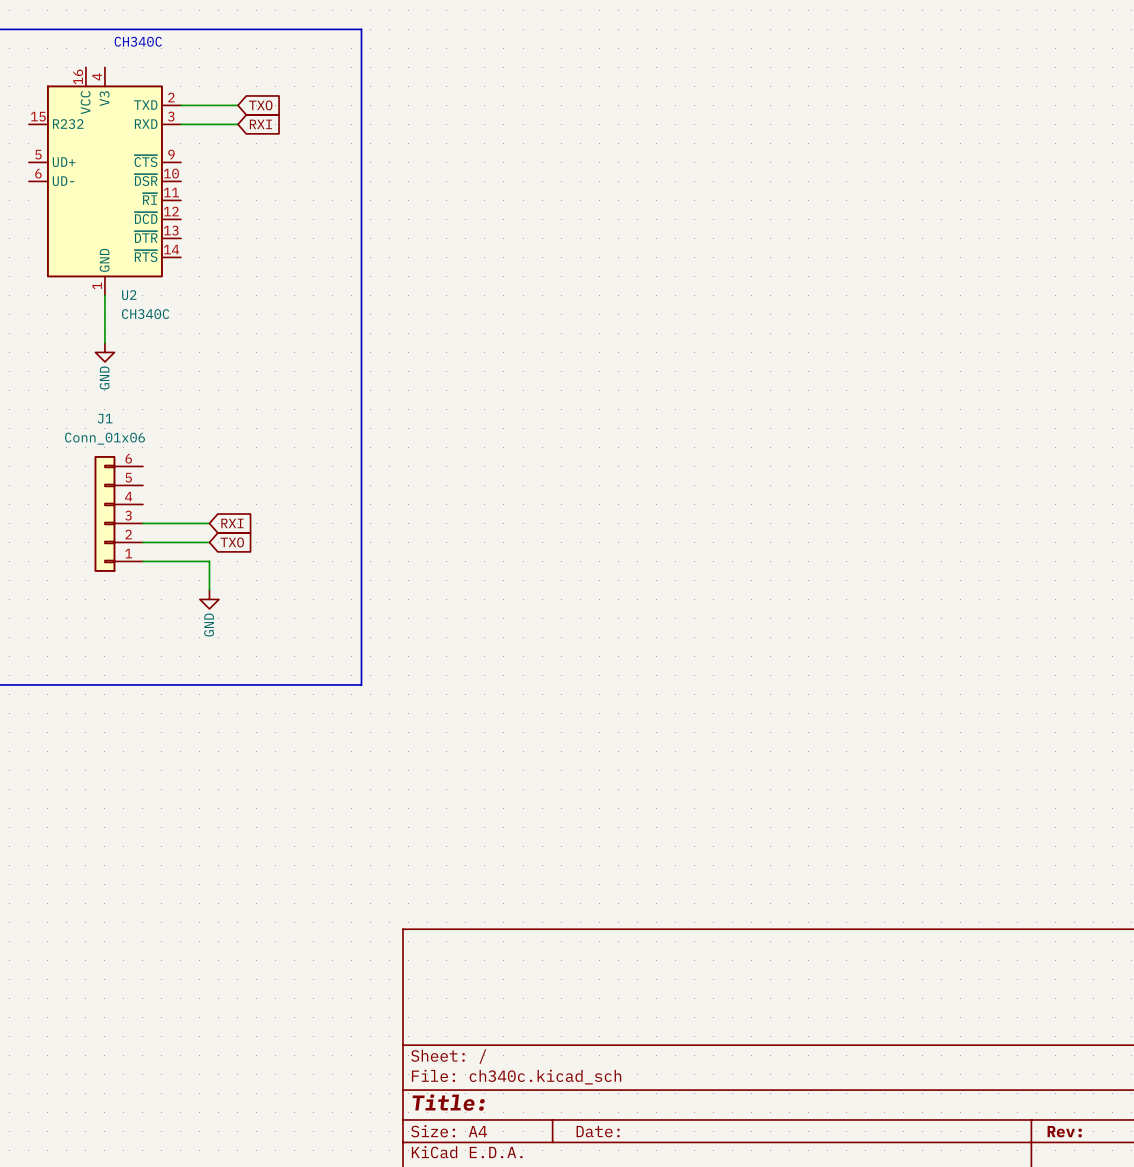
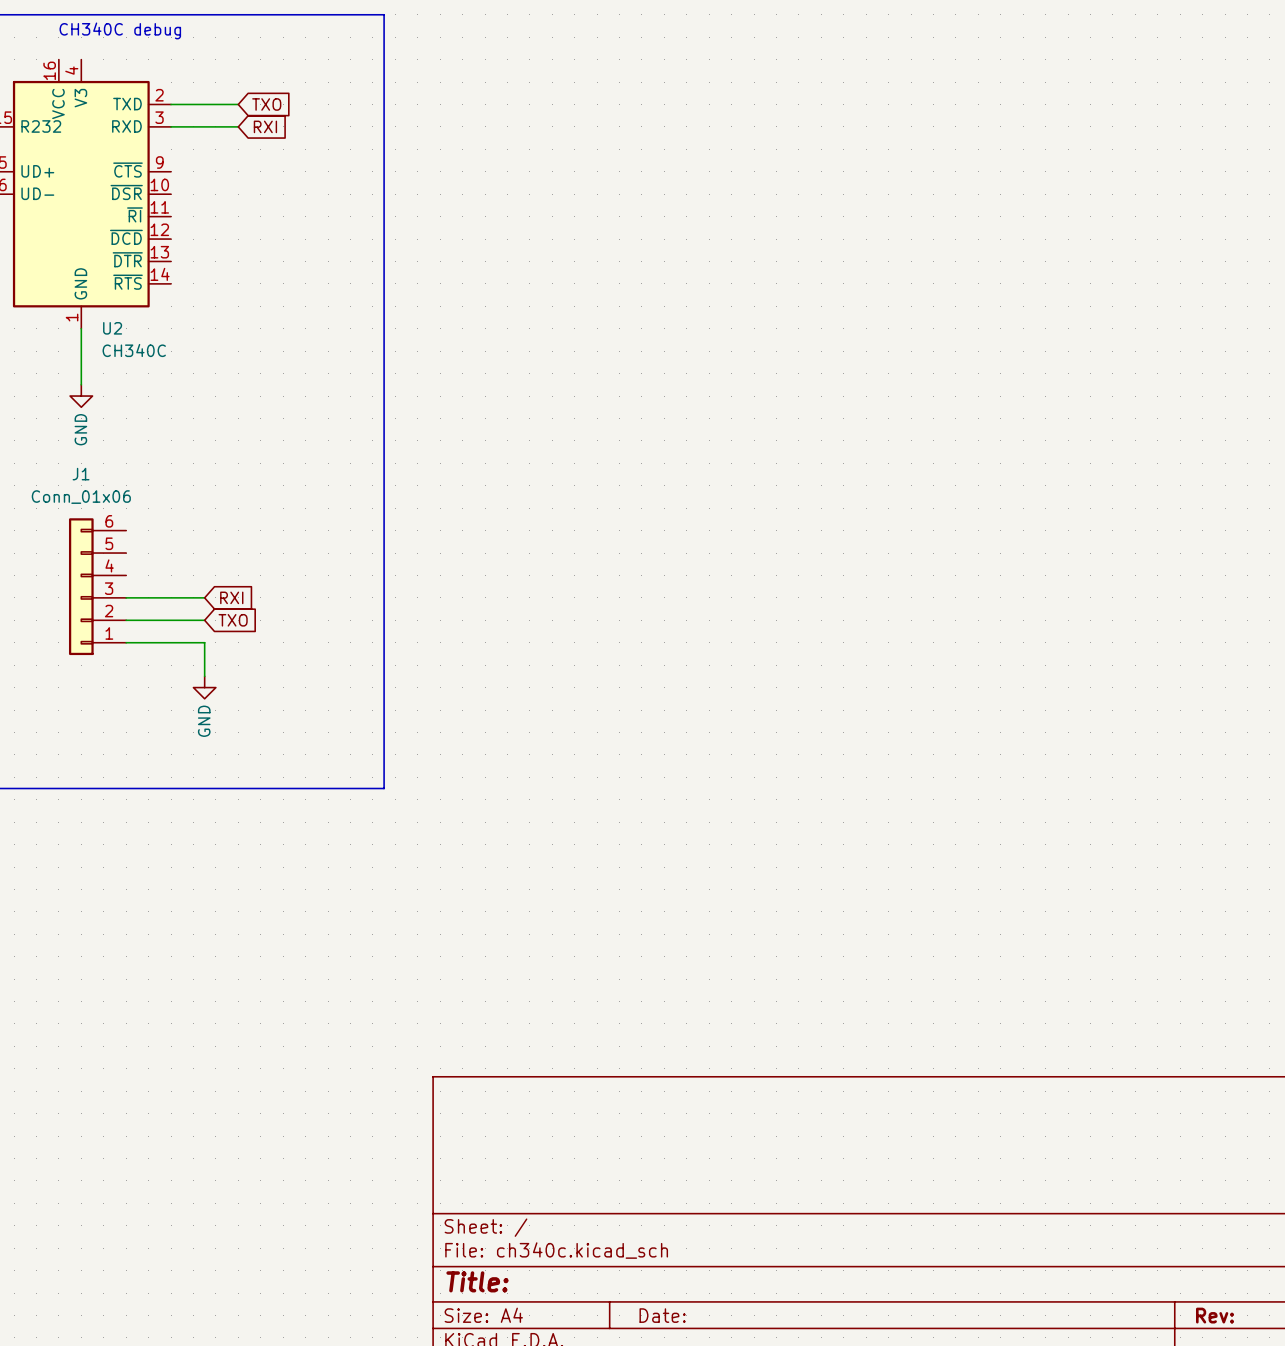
text: CH340C (138, 41) -> CH340C debug (120, 30)

